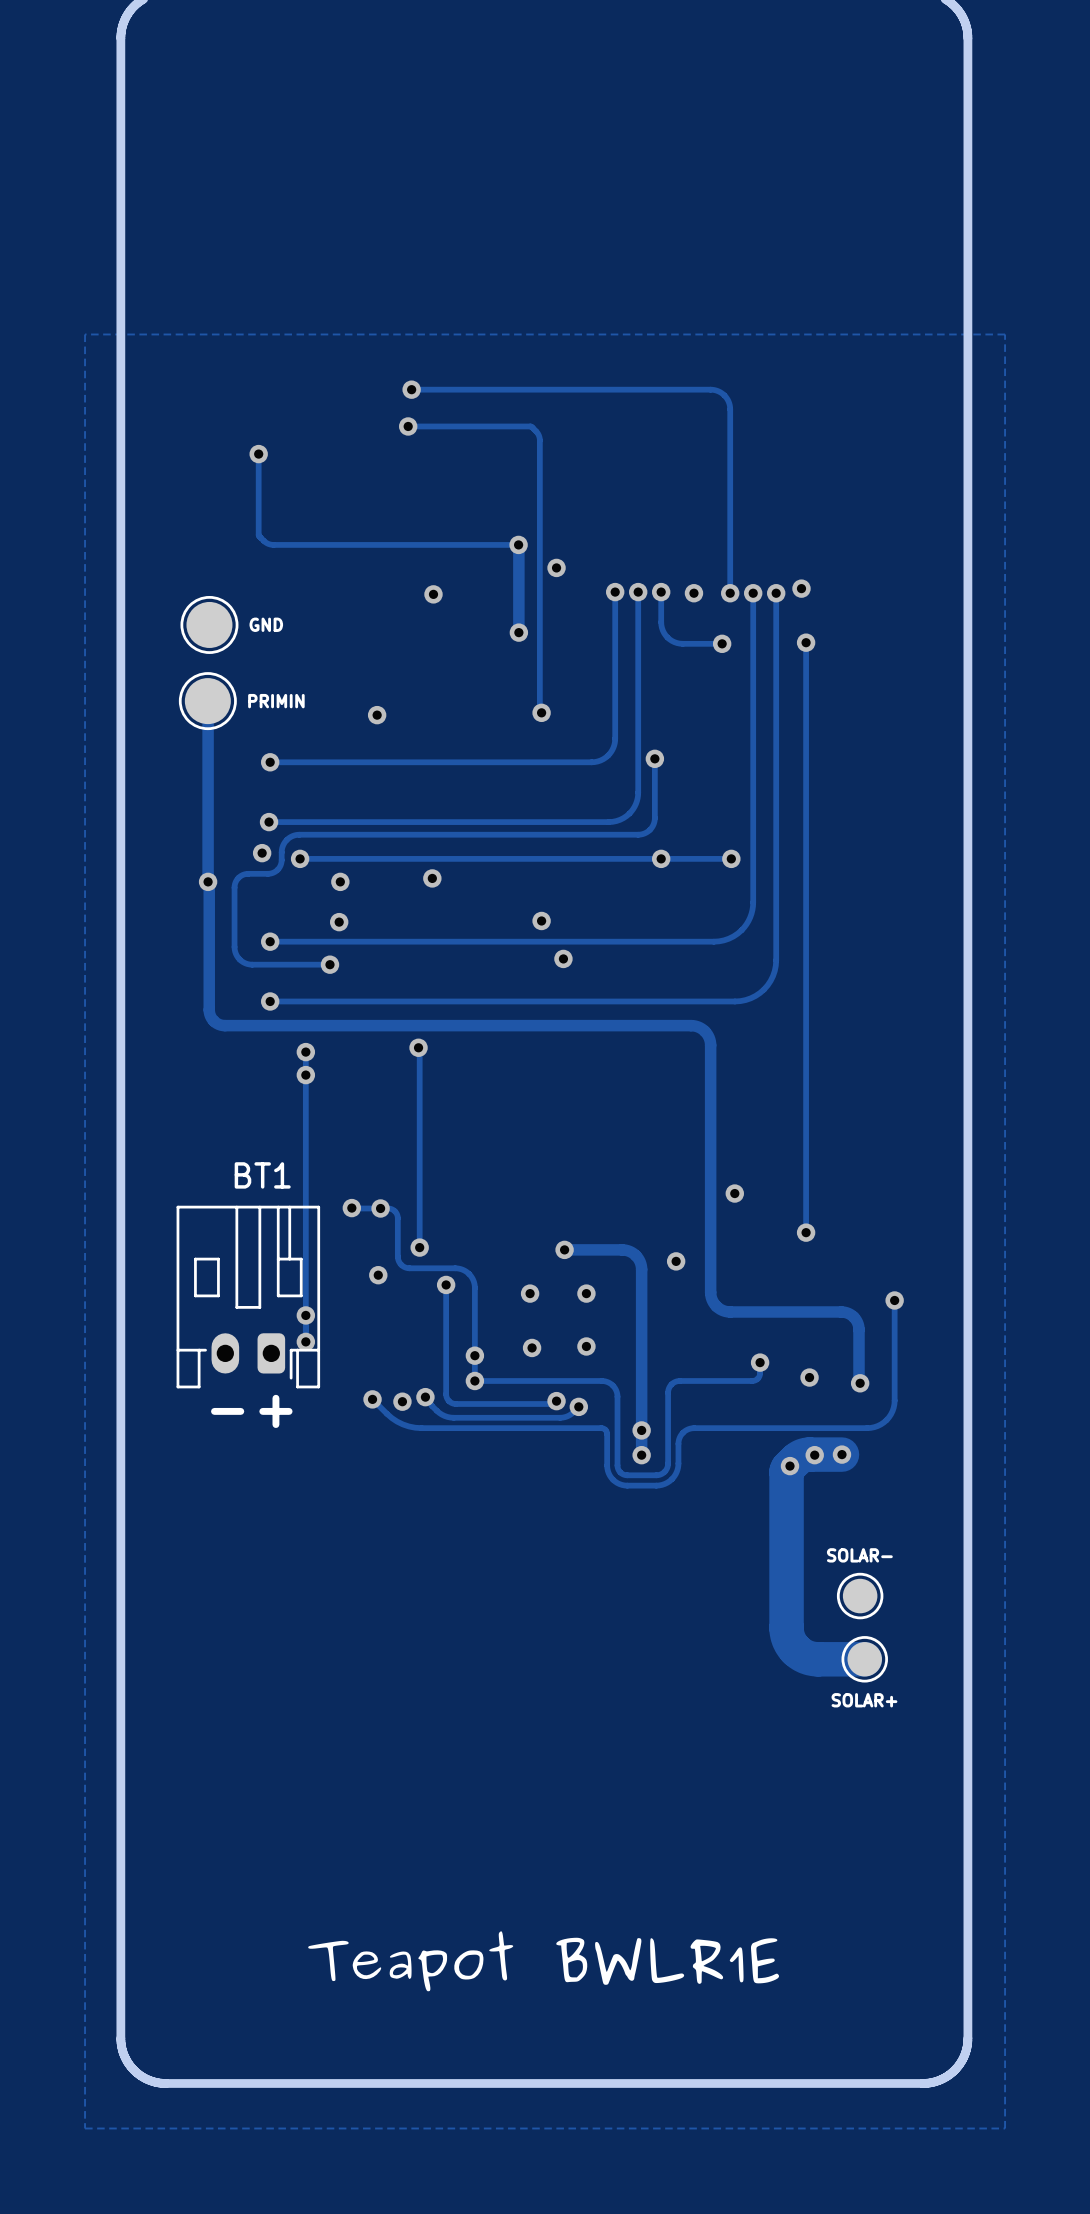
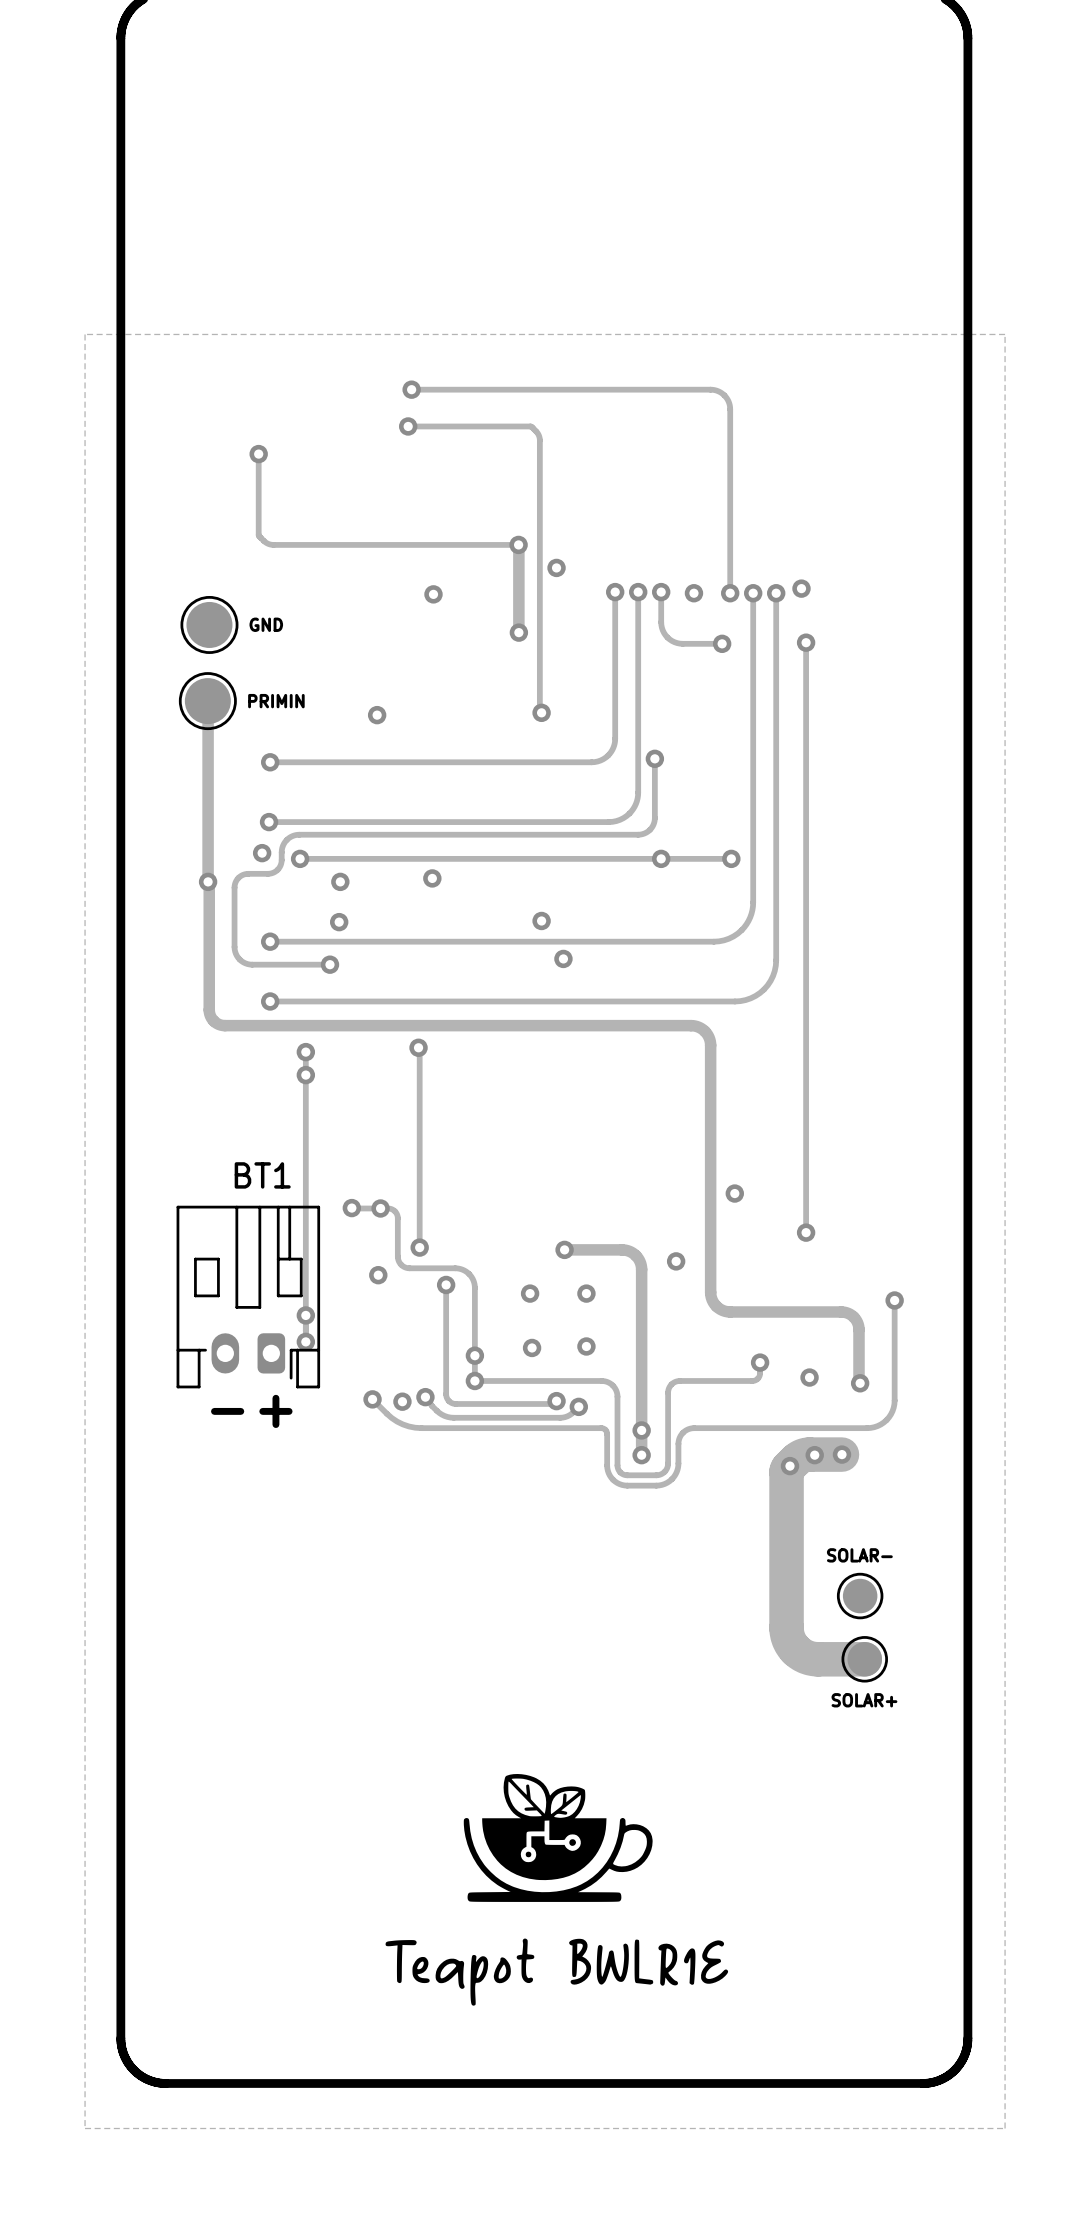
drawing: none -> [463, 1773, 653, 1902]
drawing: [308, 1931, 514, 1992] -> none
drawing shape: [556, 1937, 780, 1985] -> [569, 1938, 729, 1986]
drawing: none -> [385, 1938, 535, 2006]

